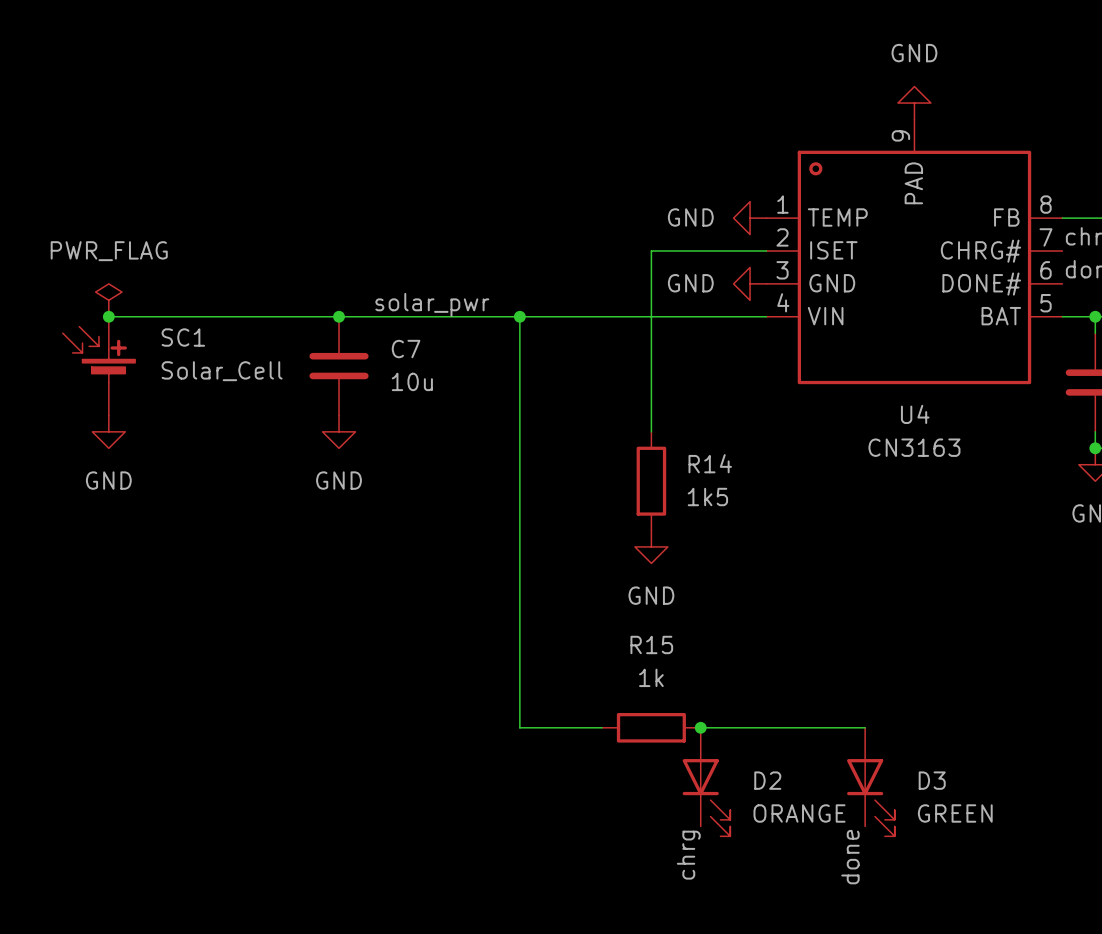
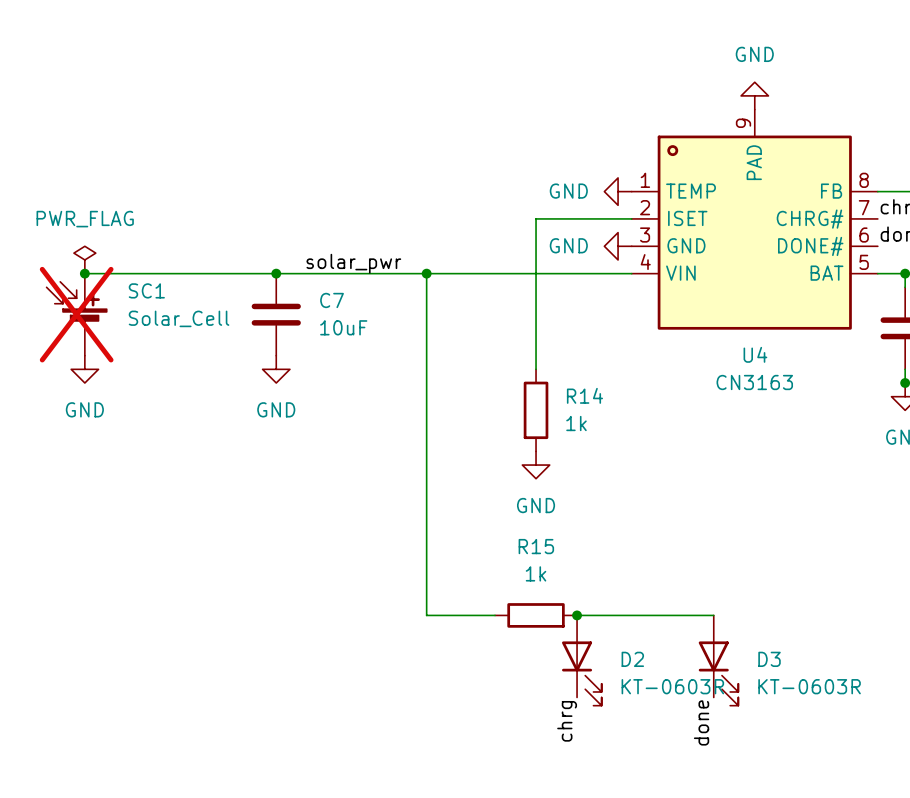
SC1 do-not-place cross: none -> (76, 314)
C7 value: 10u (412, 381) -> 10uF (343, 327)
R14 value: 1k5 (707, 497) -> 1k (576, 423)
D2 value: ORANGE (799, 813) -> KT-0603R (672, 686)
D3 value: GREEN (955, 813) -> KT-0603R (809, 686)

